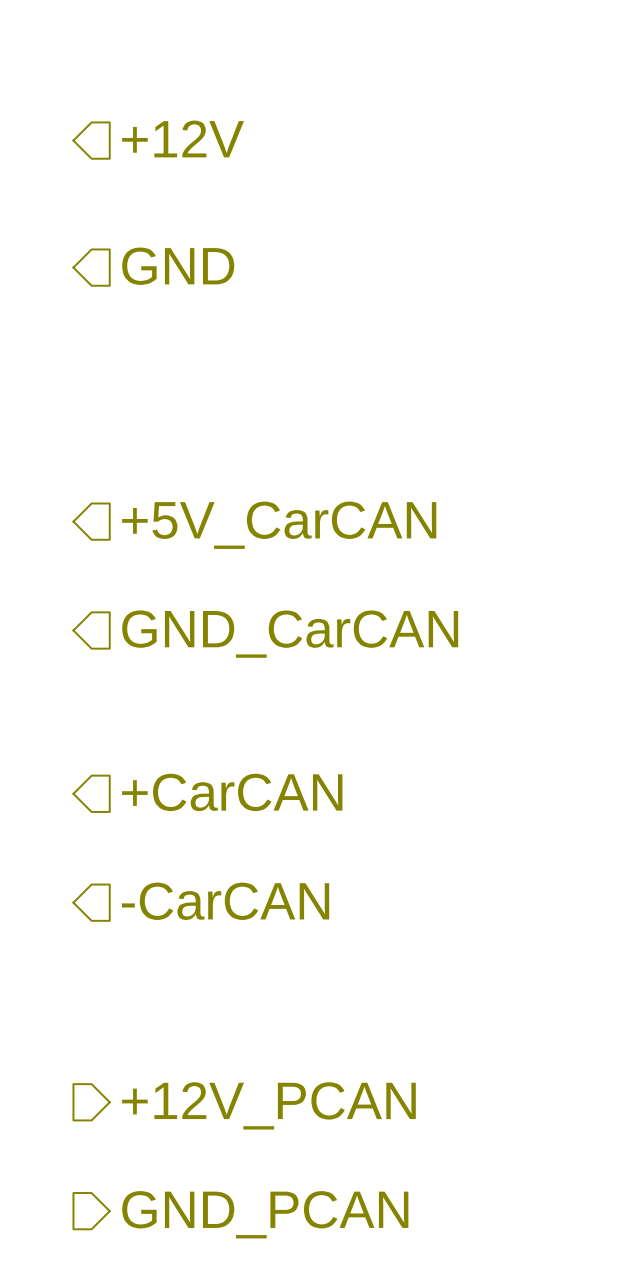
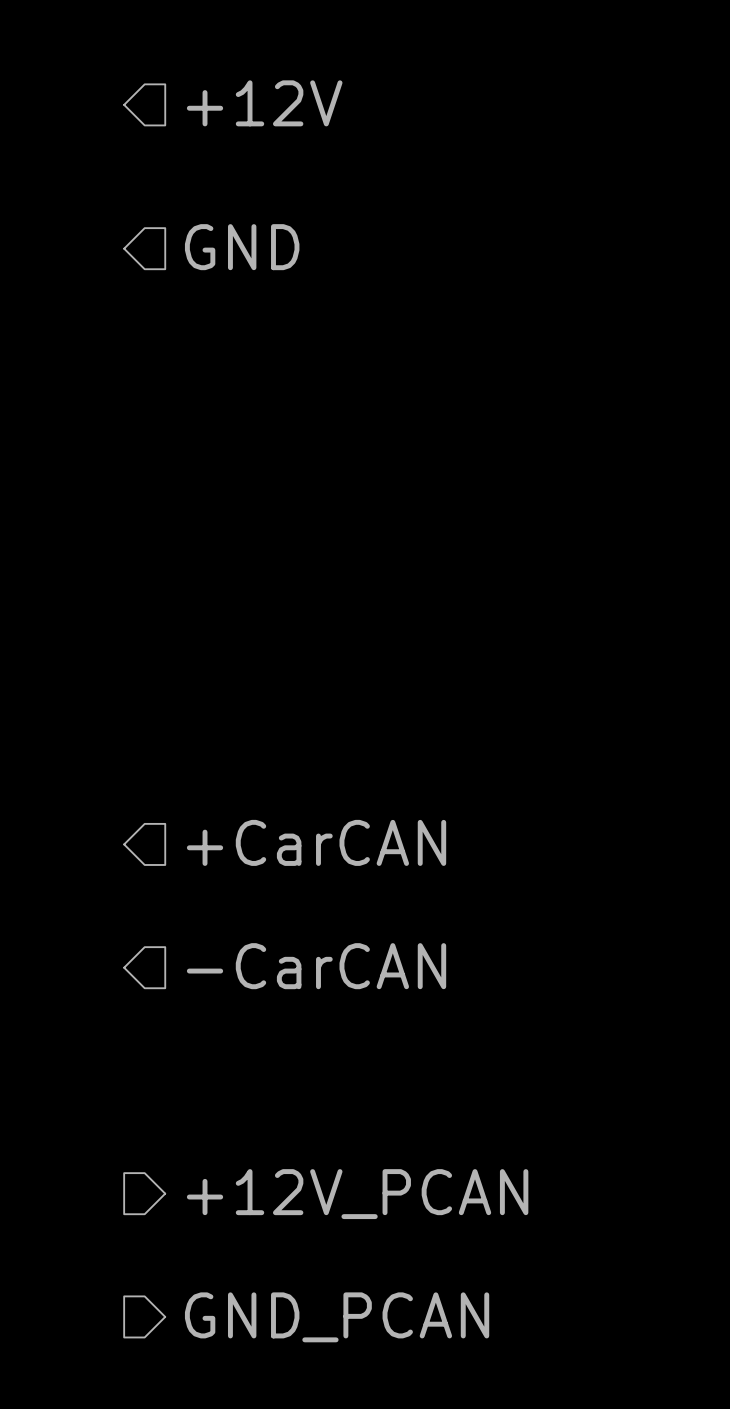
hierarchical label: +5V_CarCAN (279, 525) -> none
hierarchical label: GND_CarCAN (290, 634) -> none

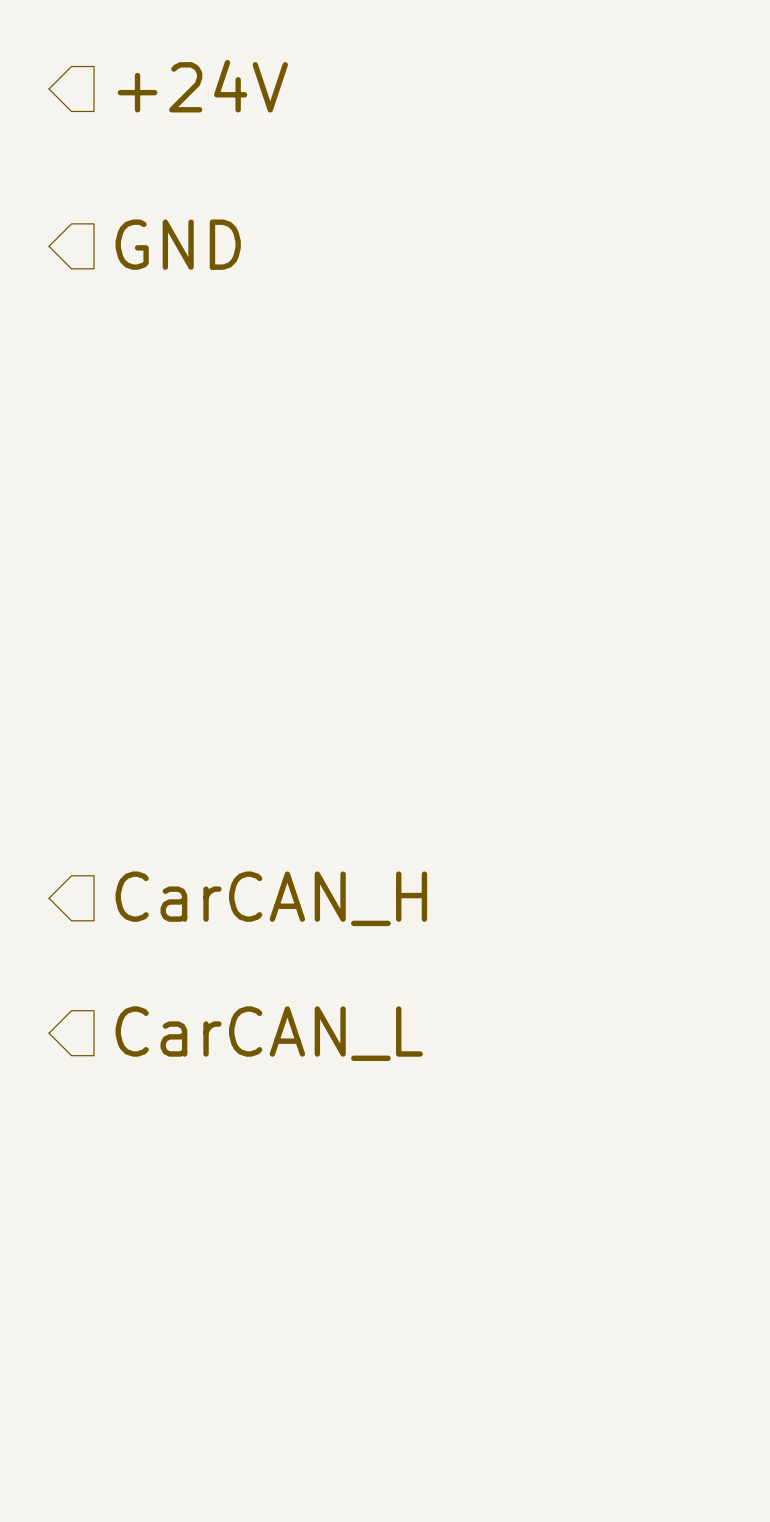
hierarchical label: +12V (264, 103) -> +24V (202, 86)
hierarchical label: +CarCAN (316, 842) -> CarCAN_H (271, 898)
hierarchical label: -CarCAN (316, 966) -> CarCAN_L (269, 1033)
hierarchical label: +12V_PCAN (357, 1194) -> none
hierarchical label: GND_PCAN (337, 1317) -> none

